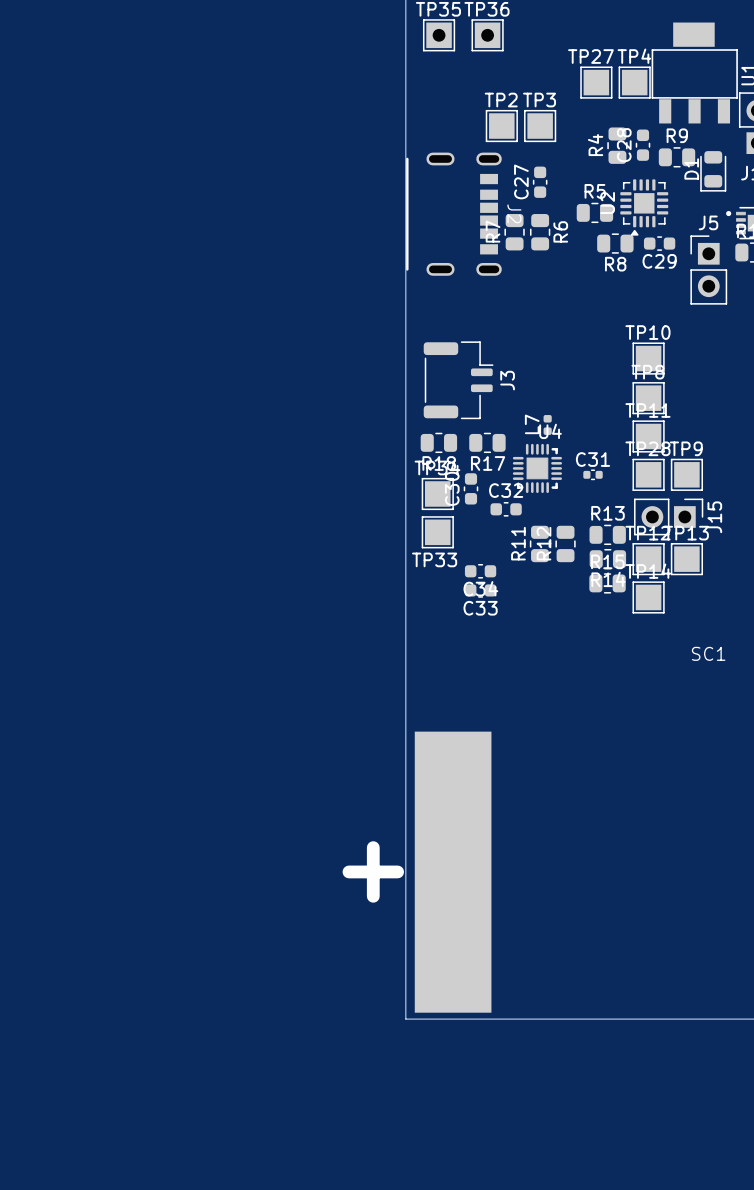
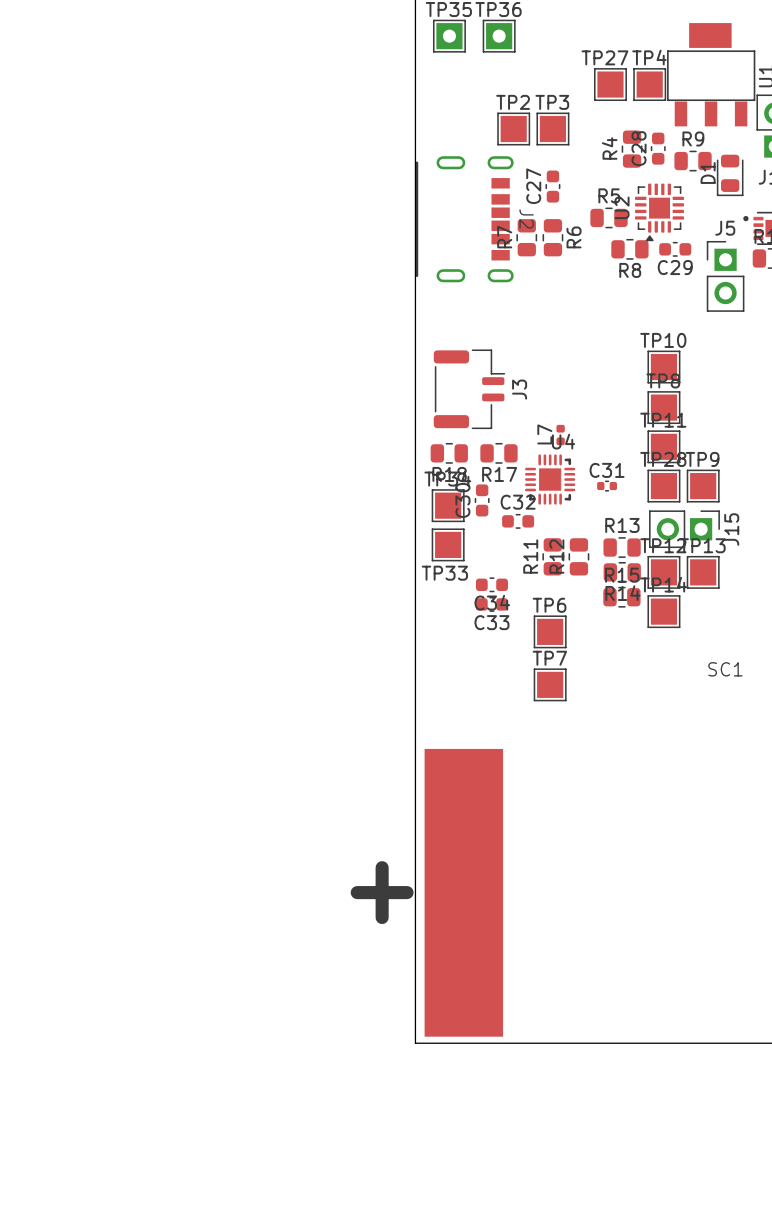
TP6: none -> (550, 631)
TP7: none -> (550, 684)

